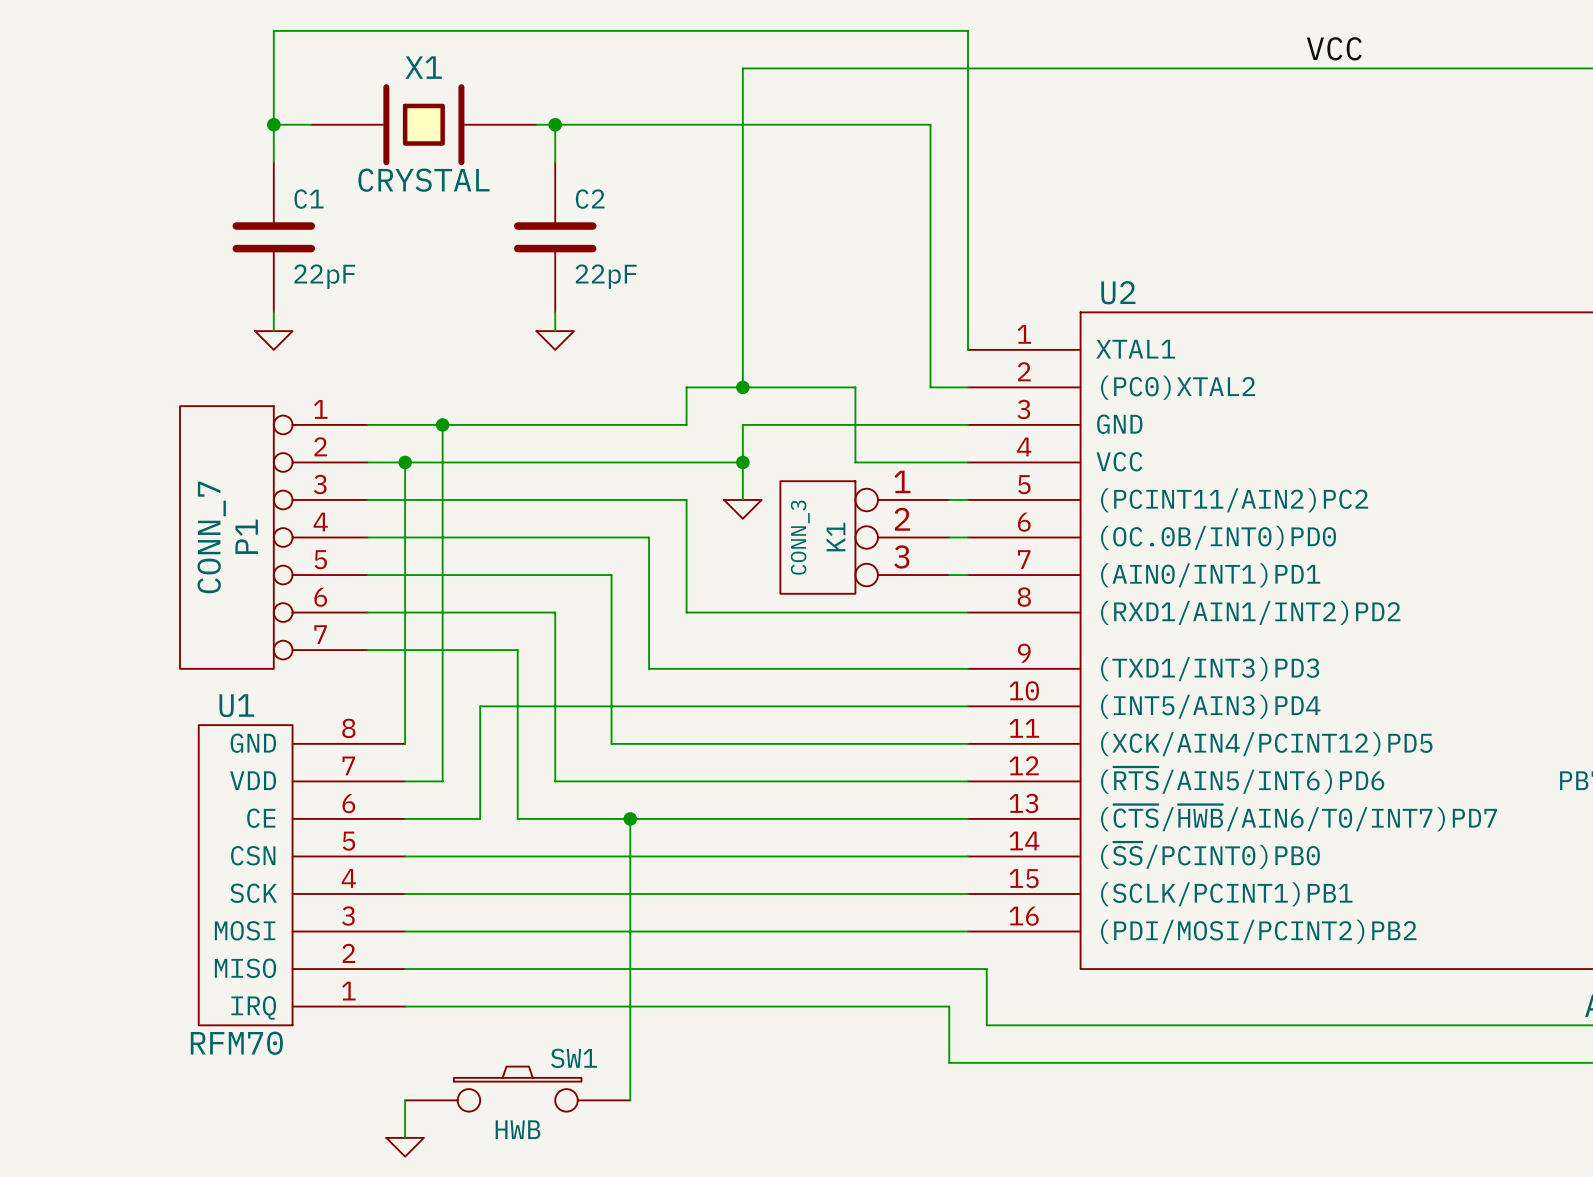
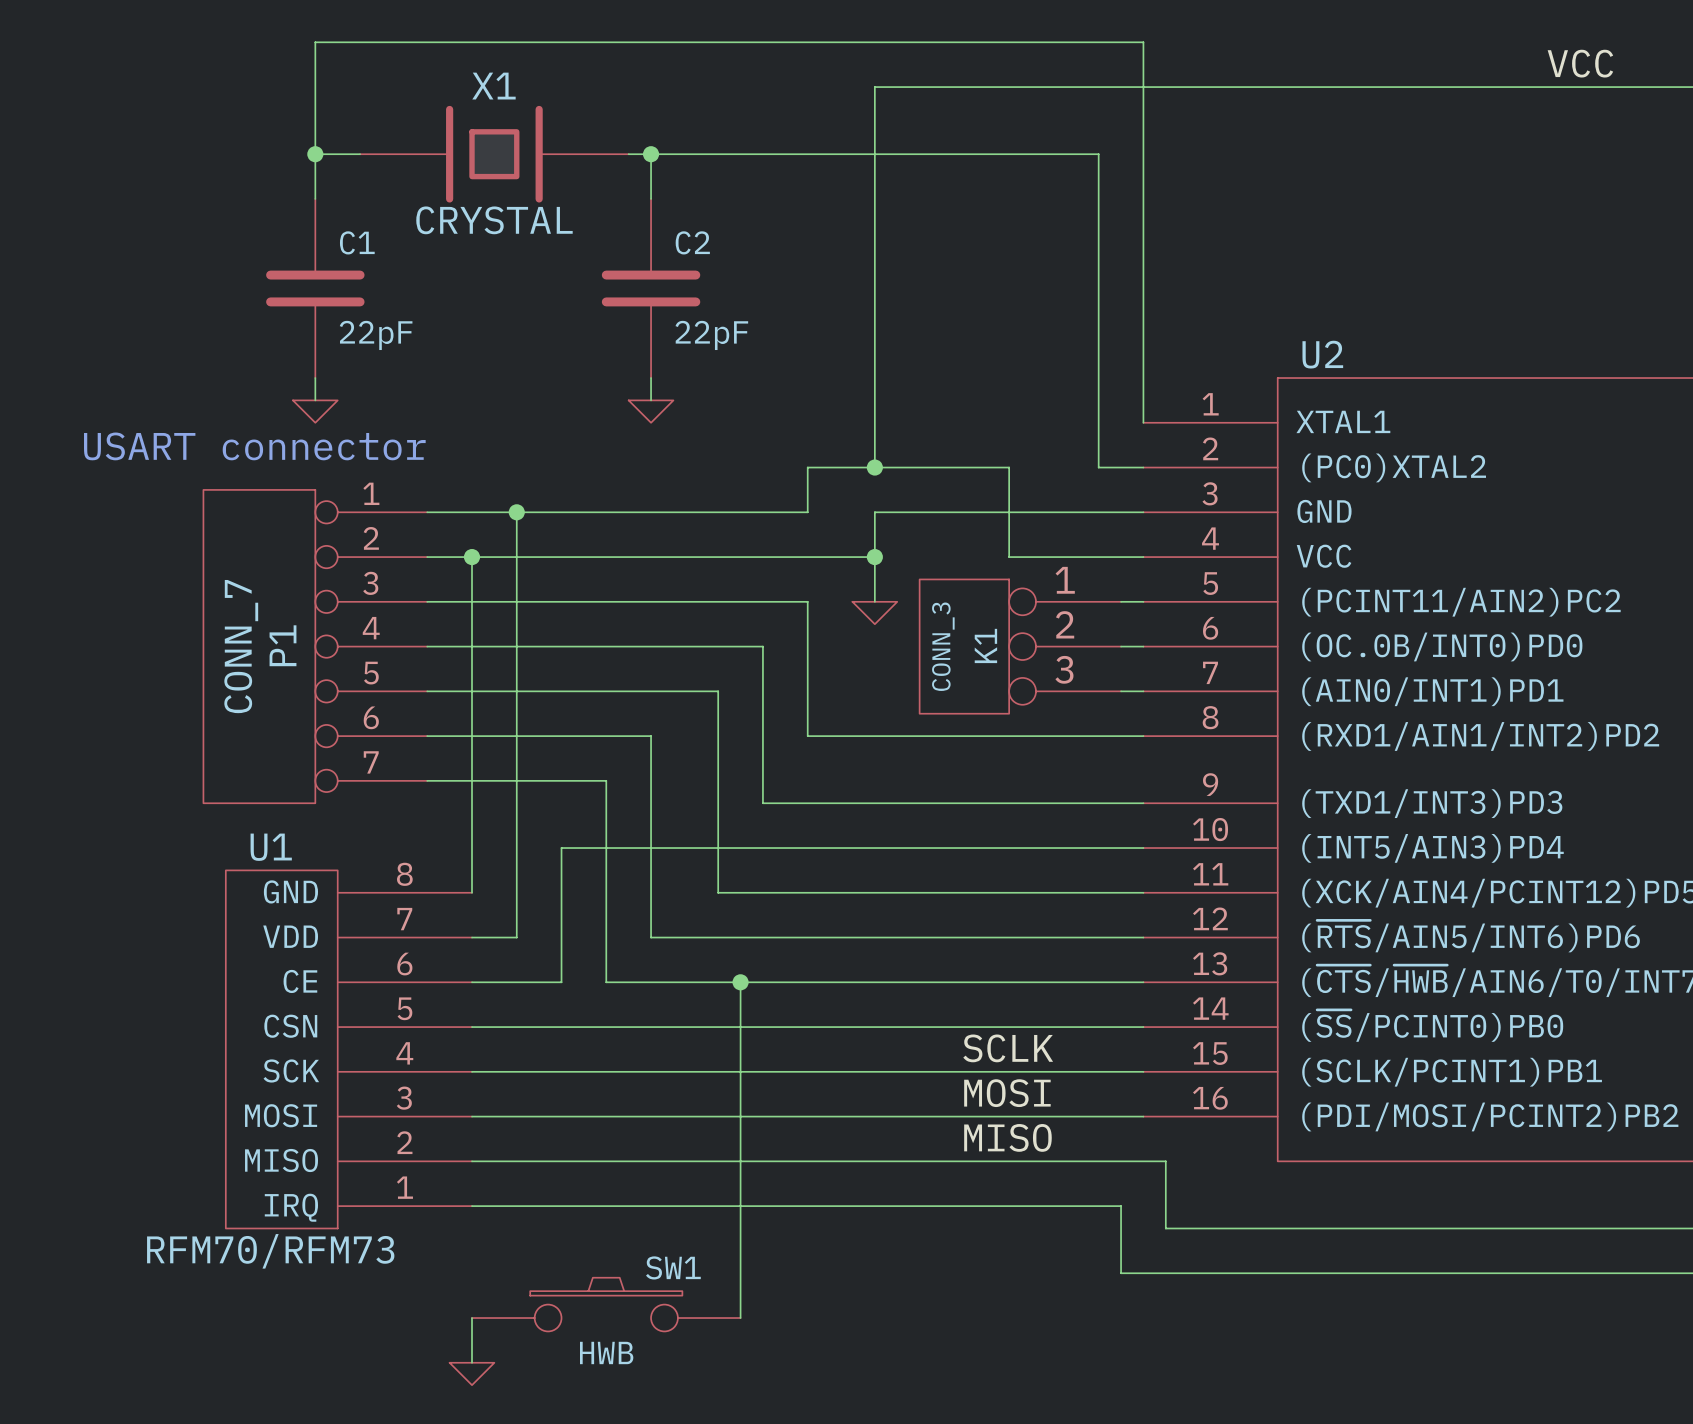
text: none -> USART connector (254, 446)
label: none -> SCLK (1008, 1048)
label: none -> MOSI (1007, 1093)
label: none -> MISO (1007, 1137)
U1 value: RFM70 (236, 1043) -> RFM70/RFM73 (270, 1251)

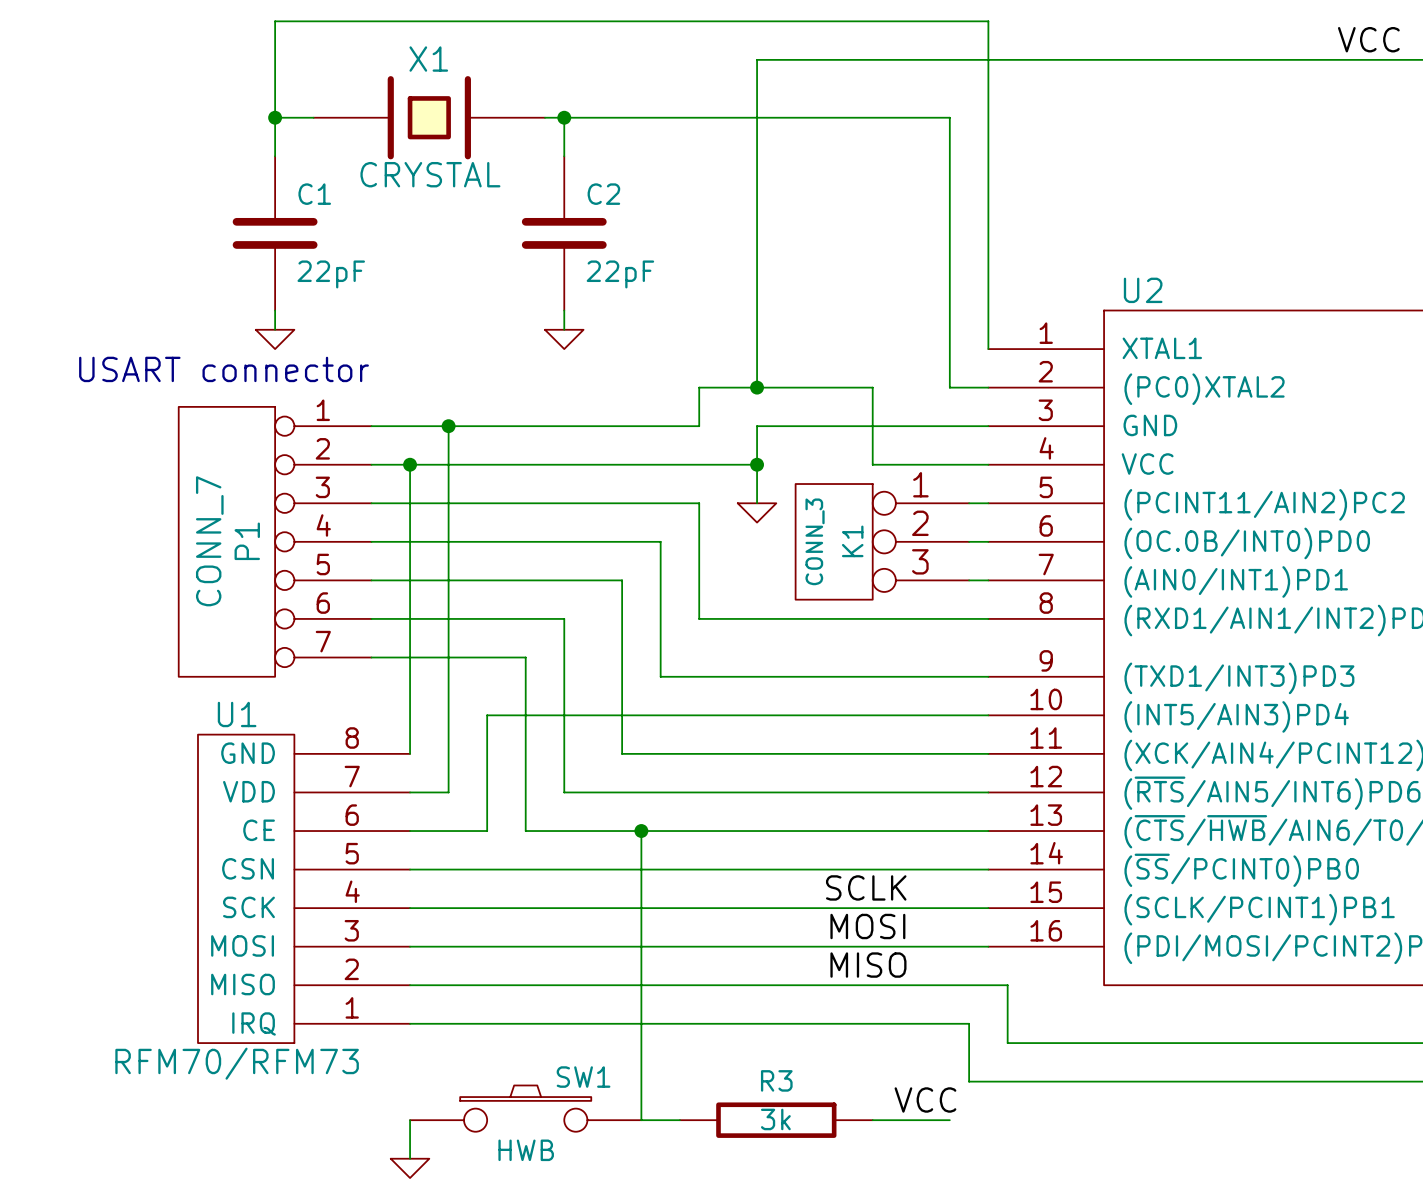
label: none -> VCC (925, 1100)
wire: none -> (641, 1120) (679, 1120)
R3: none -> 3k (776, 1120)
wire: none -> (872, 1120) (949, 1120)

